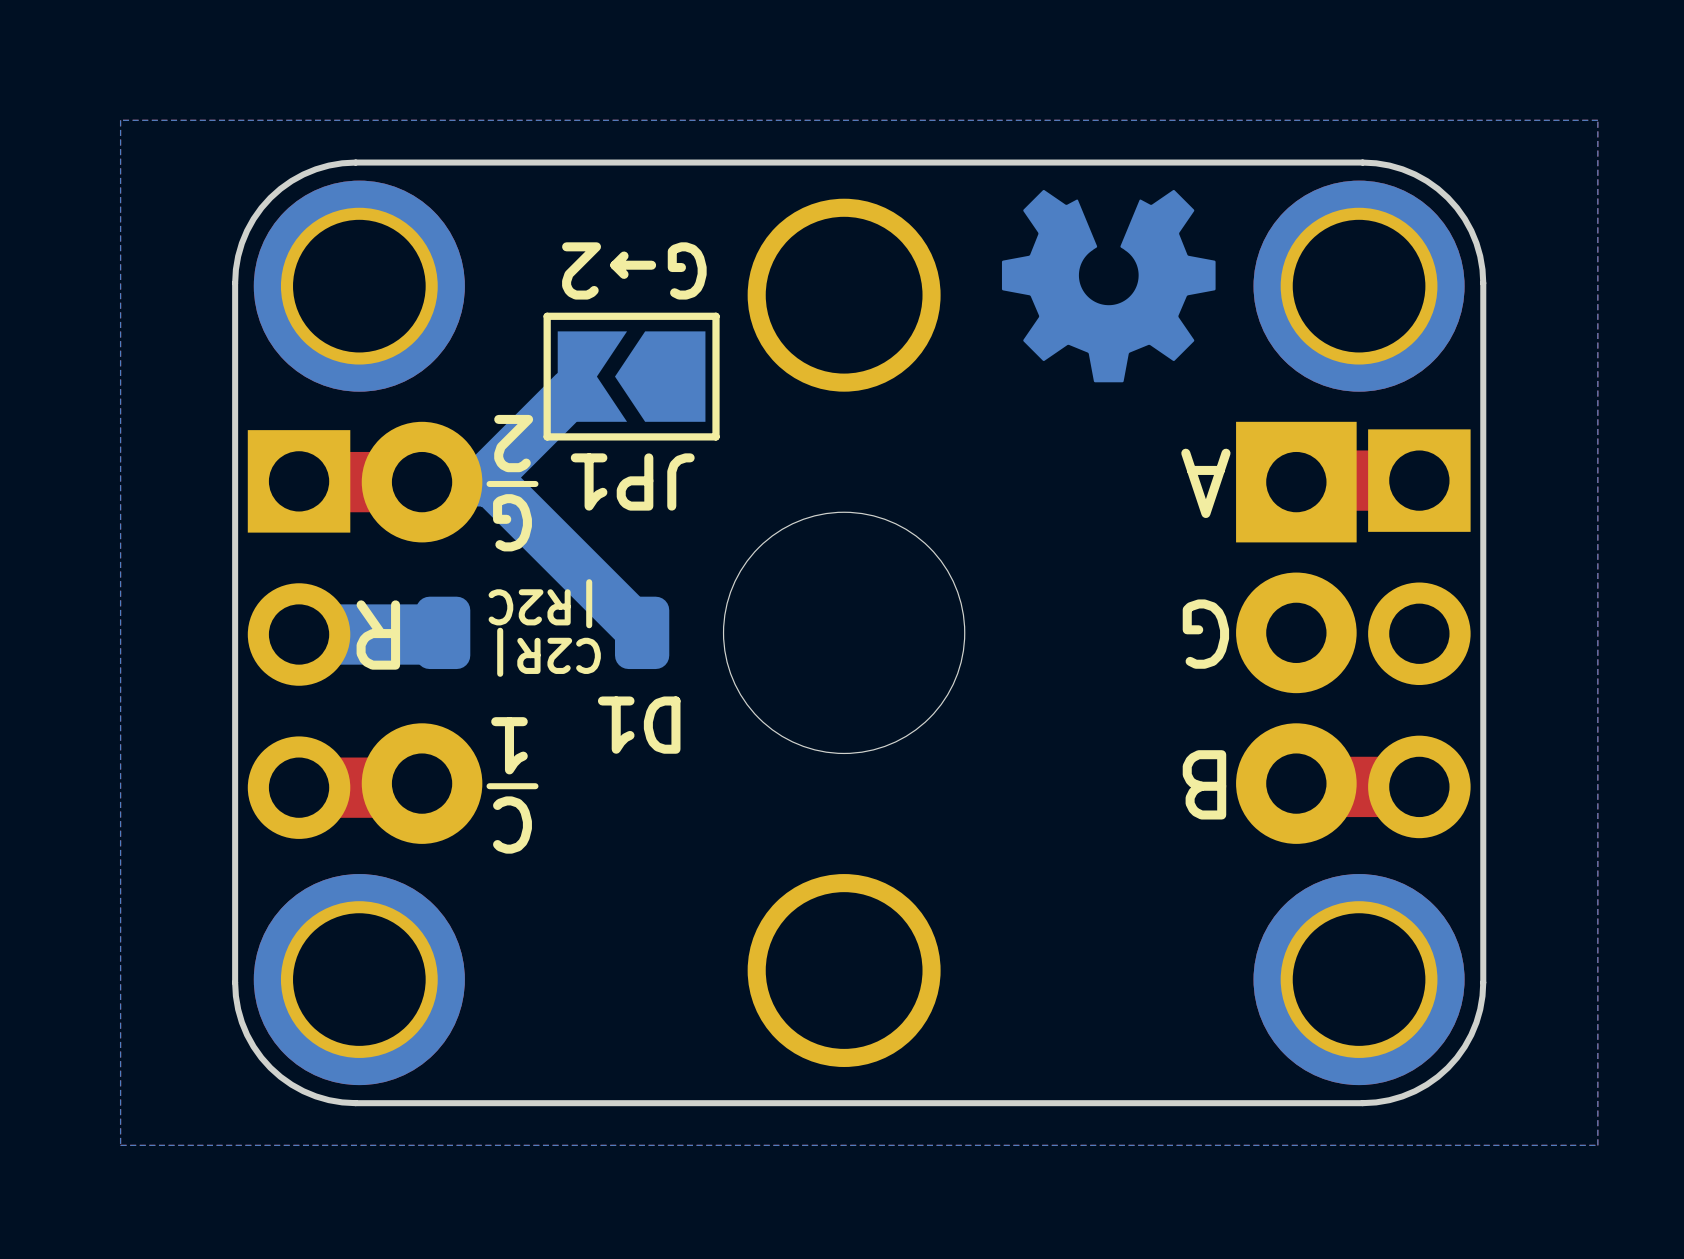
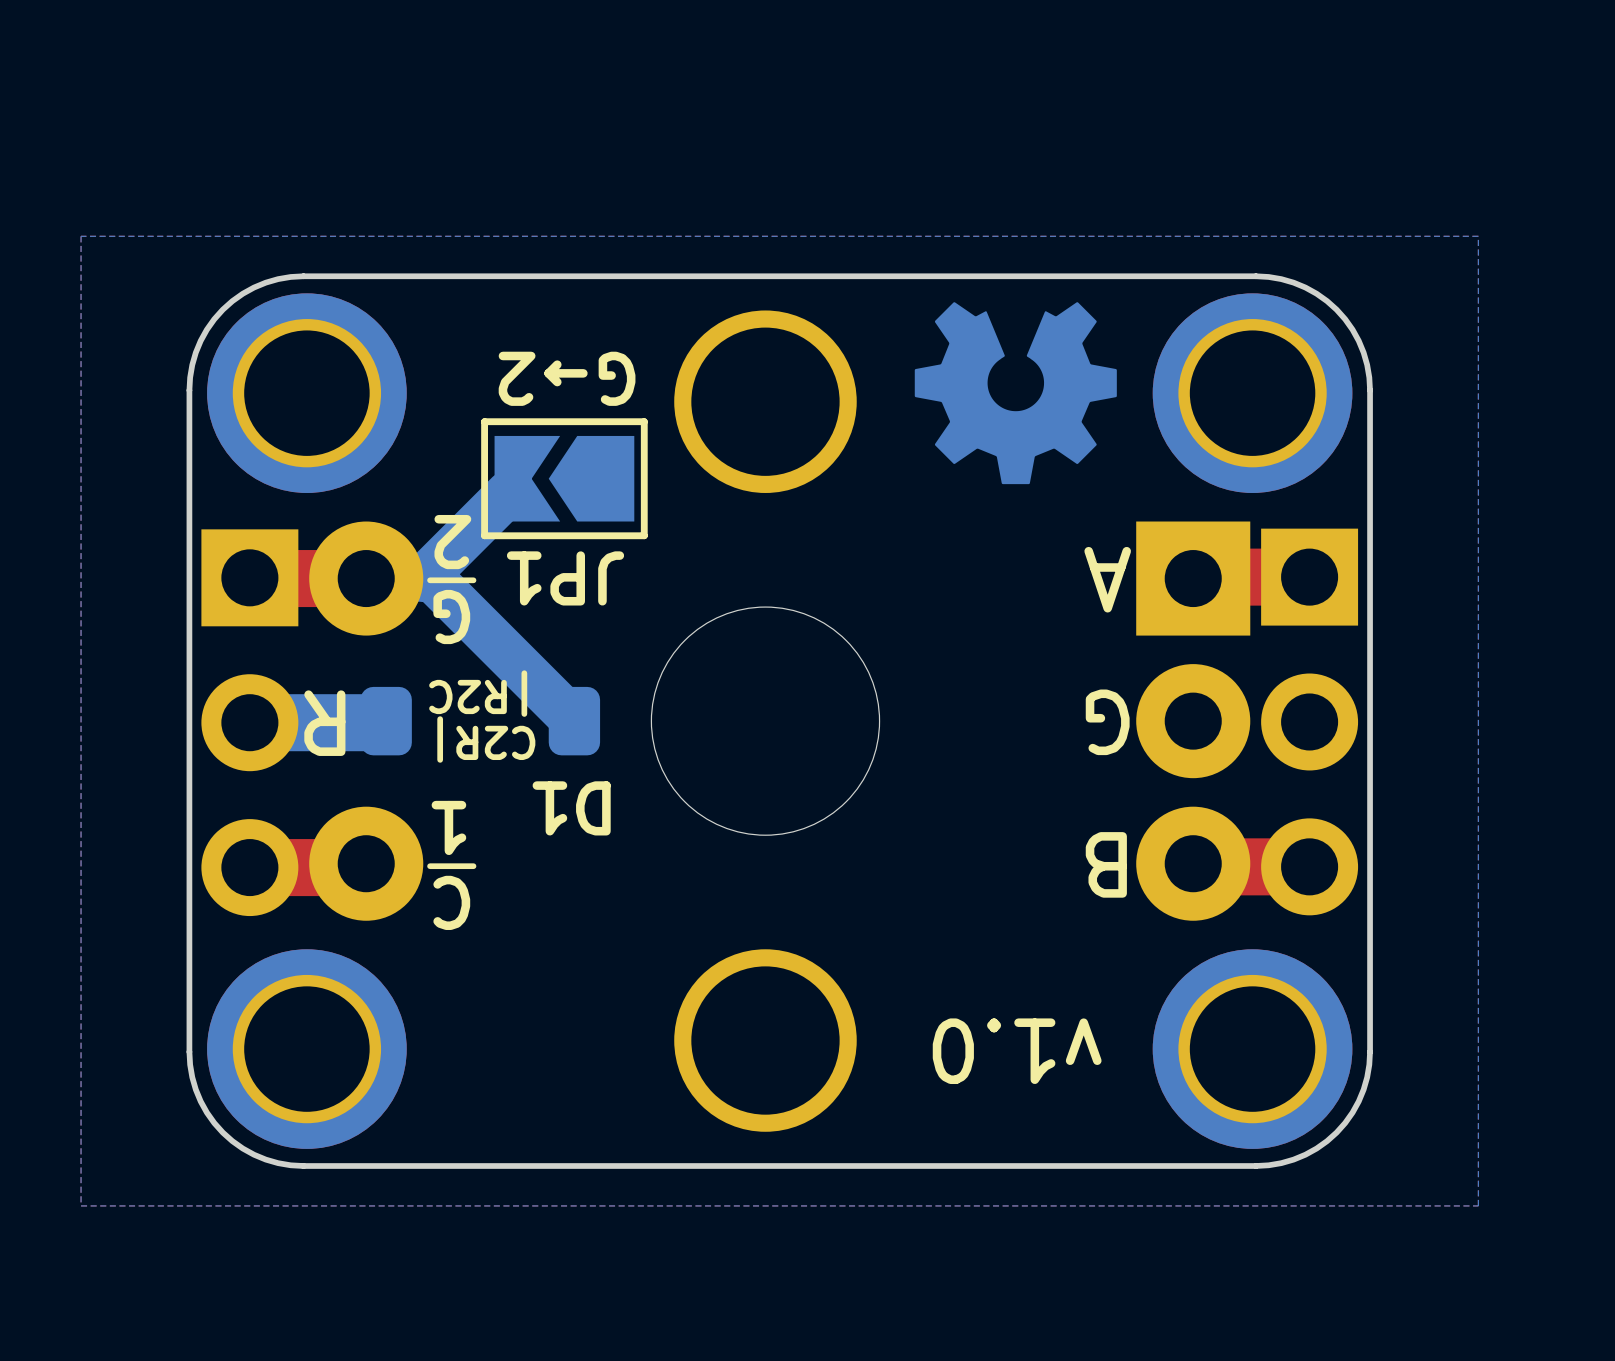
text: none -> v1.0 (1017, 1051)

